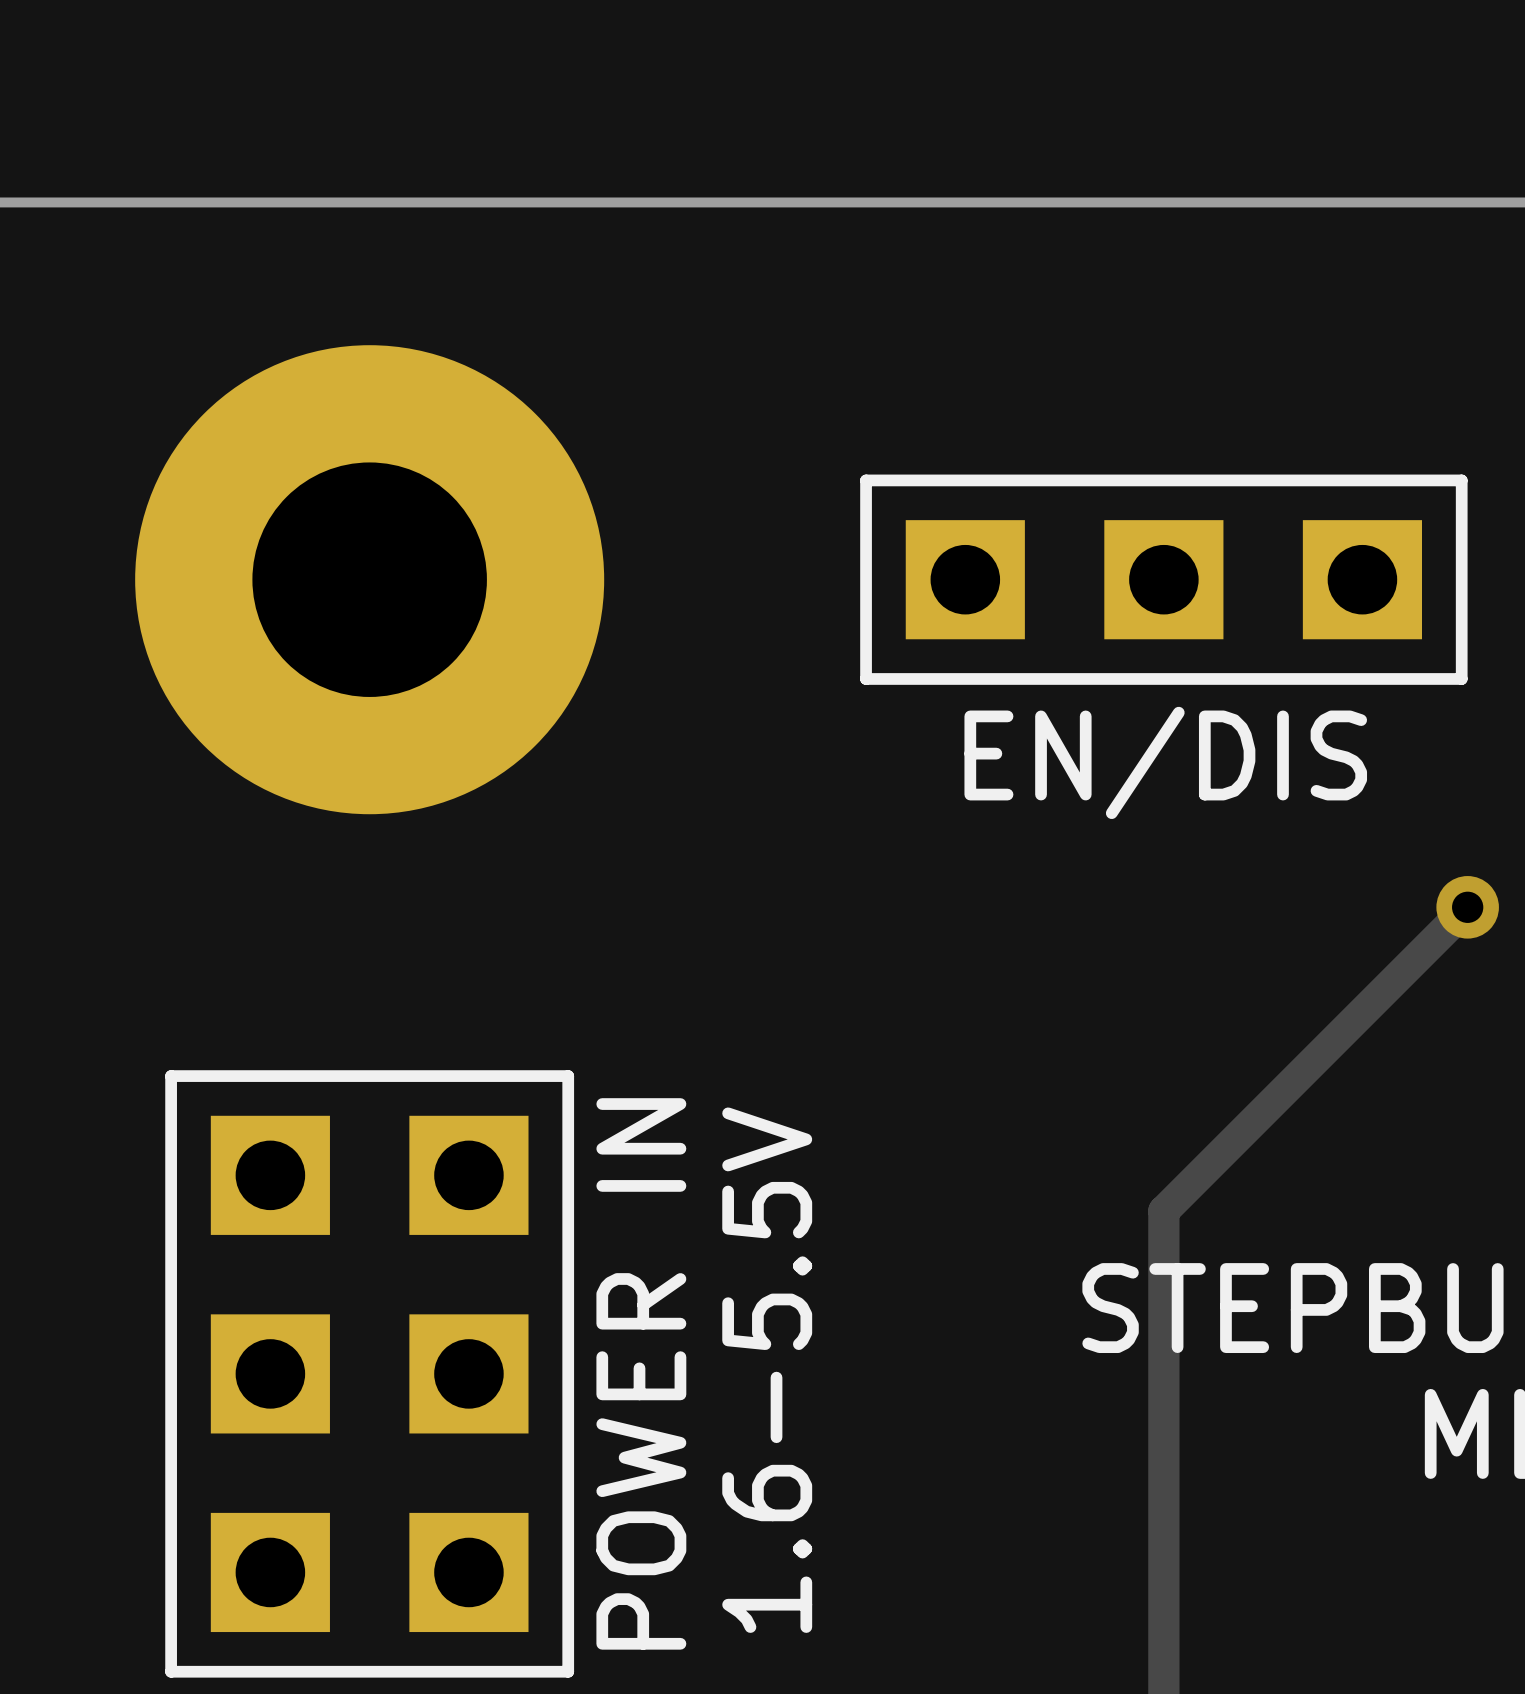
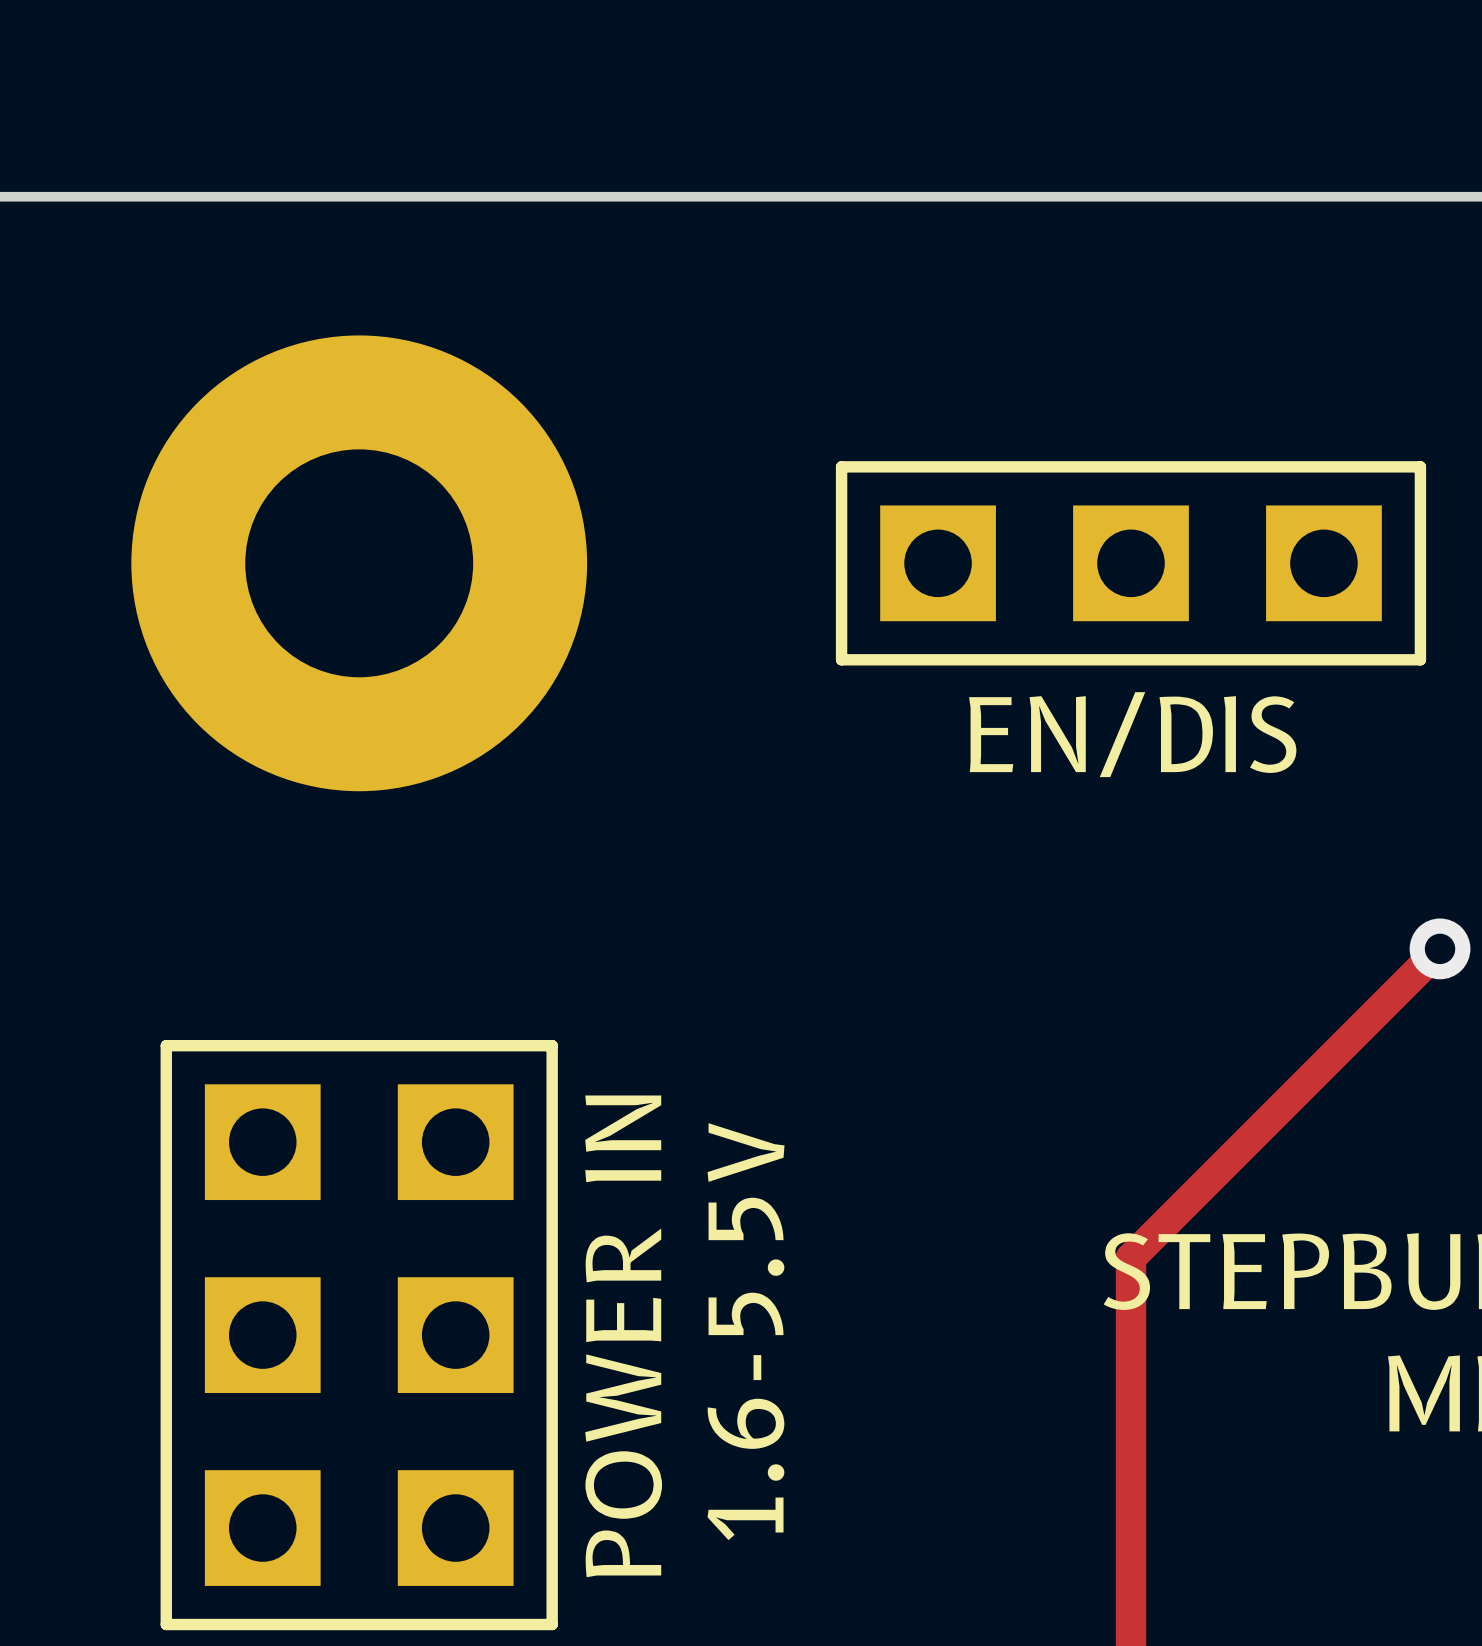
track: (1467, 907) (1163, 1211) (1163, 1294) -> (1440, 948) (1131, 1257)
via: (1467, 907) -> none
via: none -> (1440, 948)

